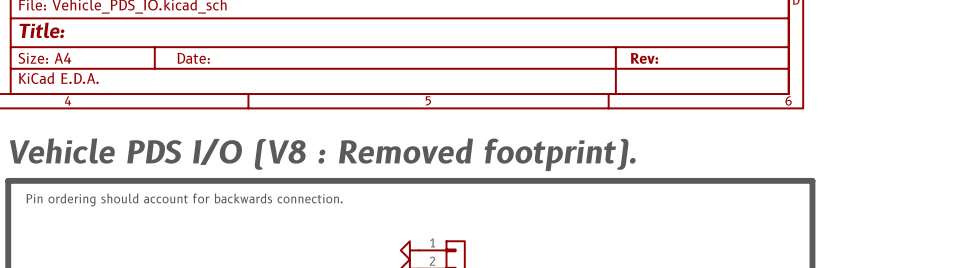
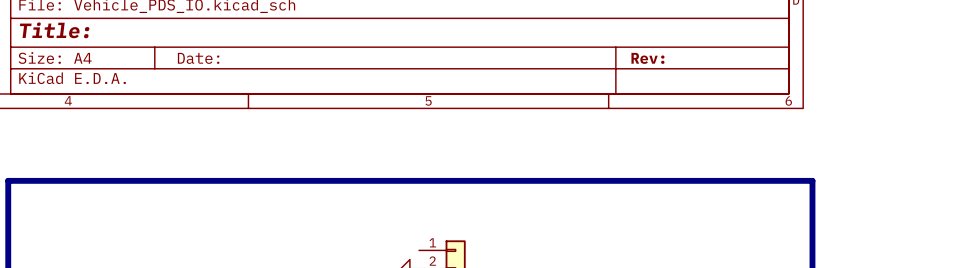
text: Vehicle PDS I/O (V8 : Removed footprint). (322, 154) -> none
text: Pin ordering should account for backwards connection. (184, 199) -> none
power symbol: (409, 250) -> none

